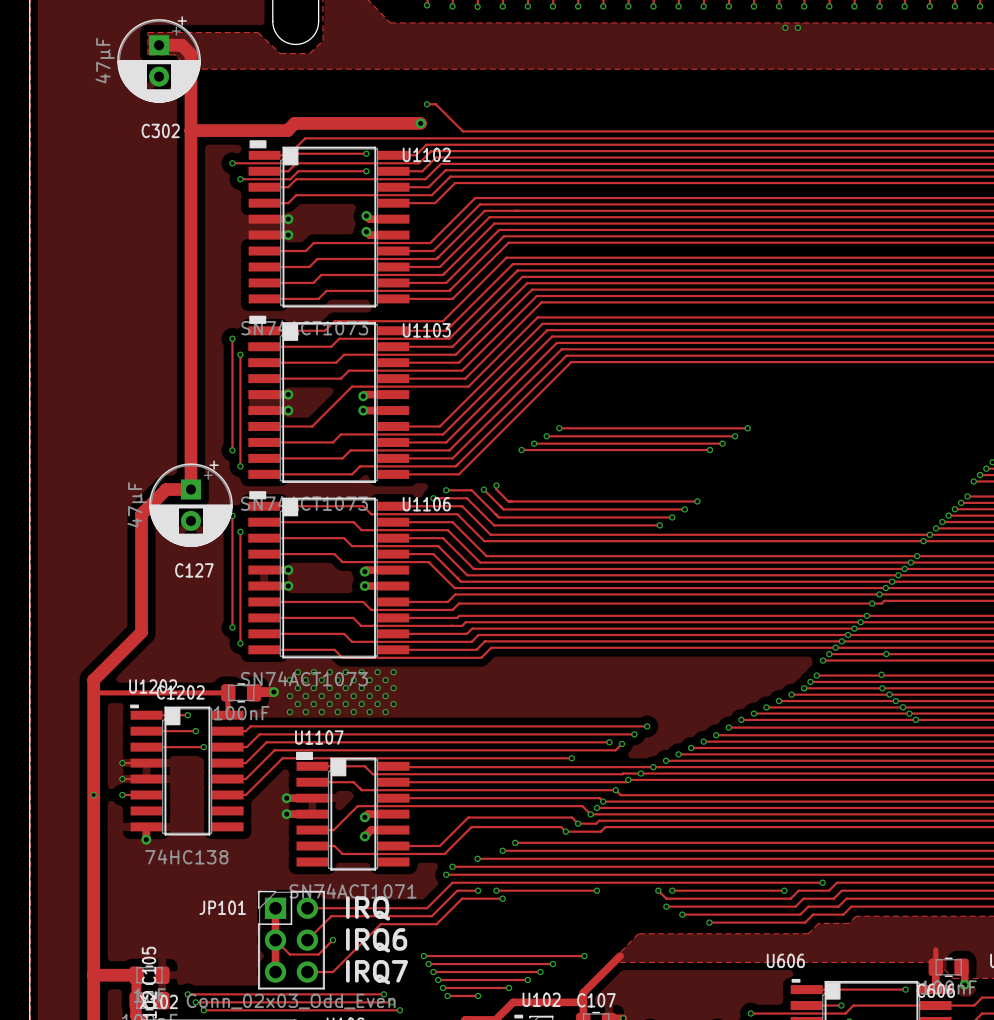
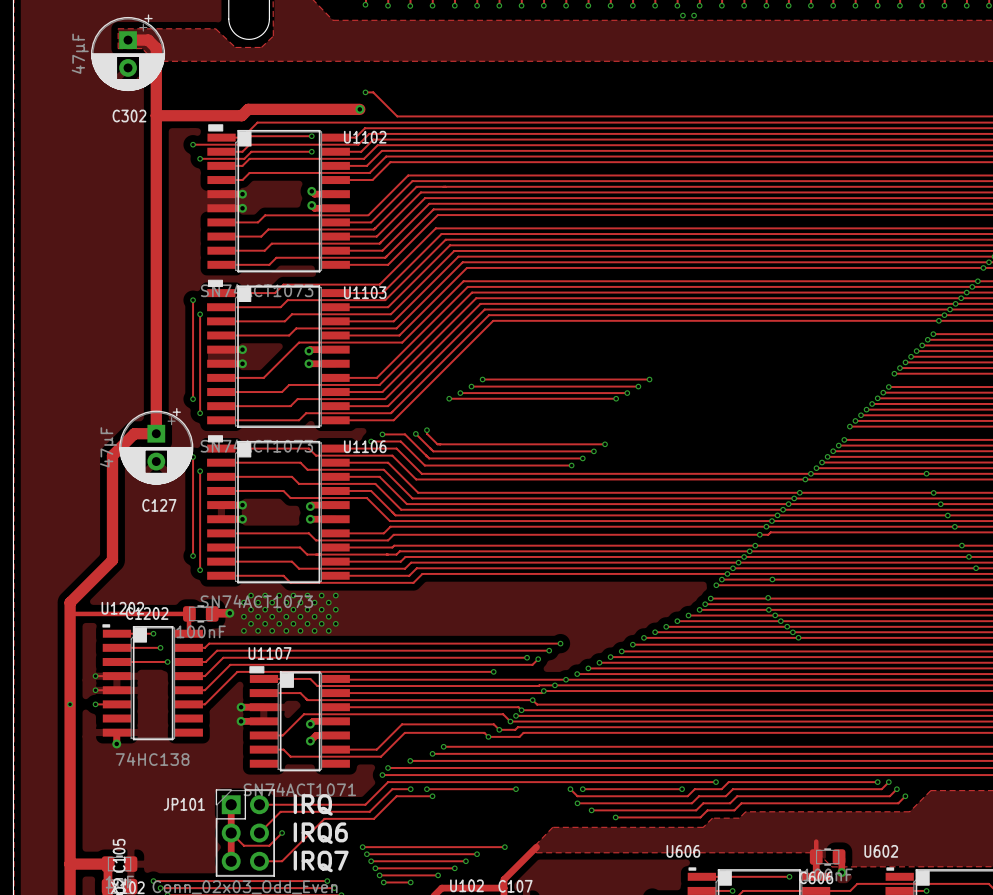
via: none -> (682, 15)
via: none -> (694, 15)
via: (785, 27) -> none
via: (797, 27) -> none

